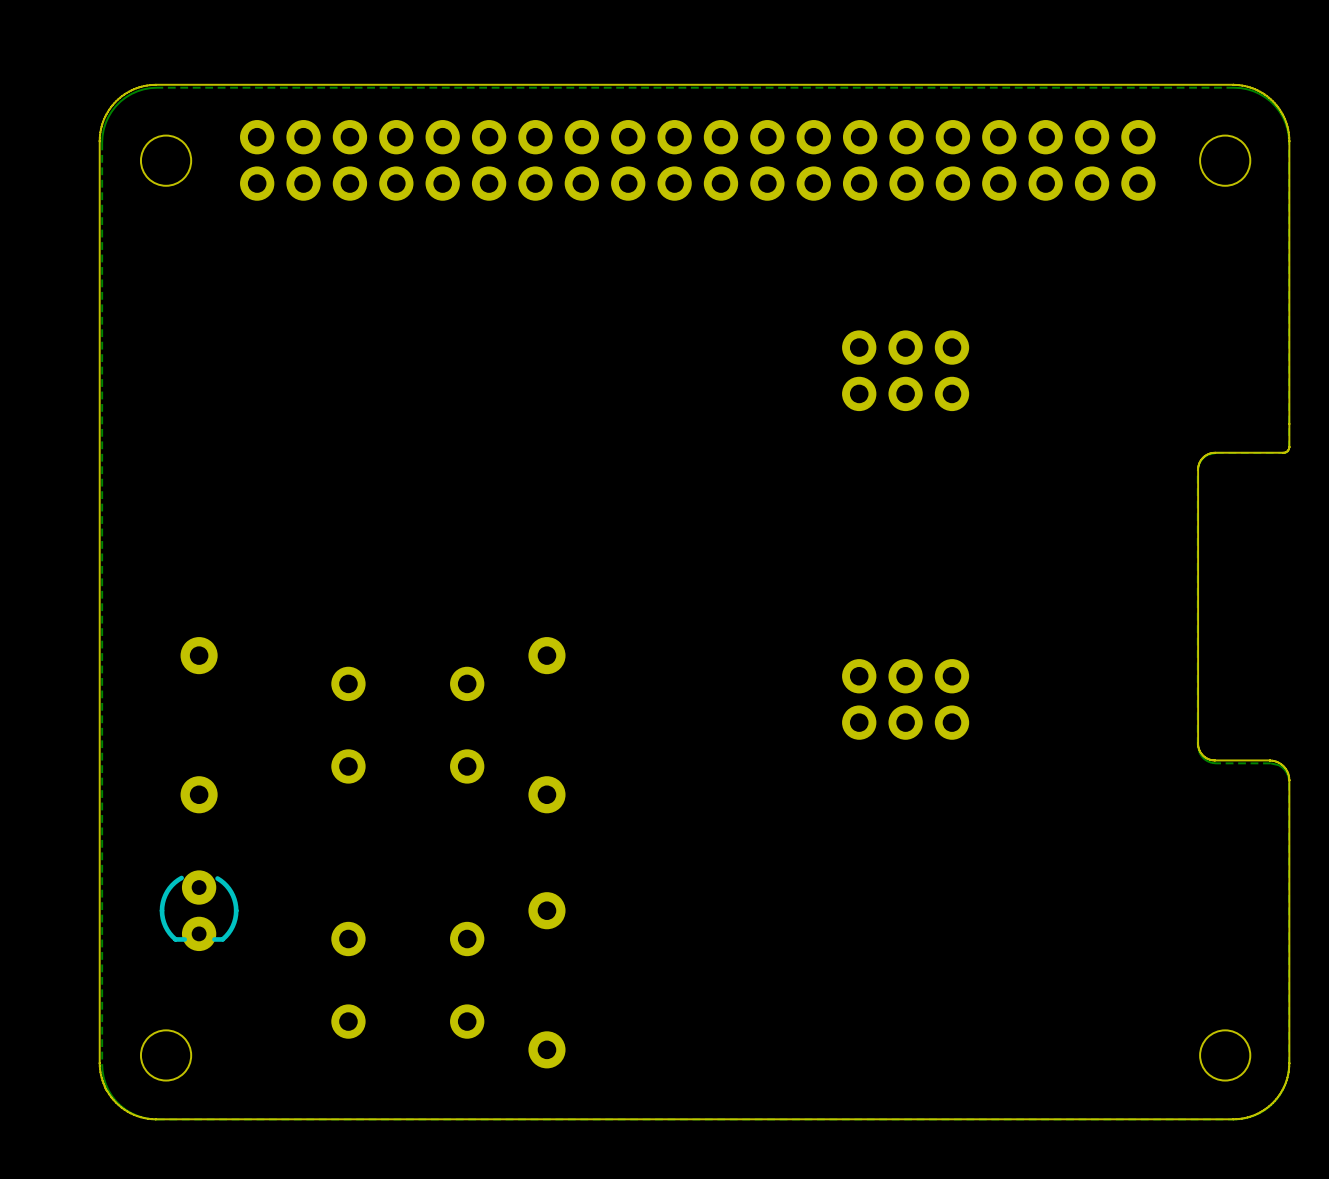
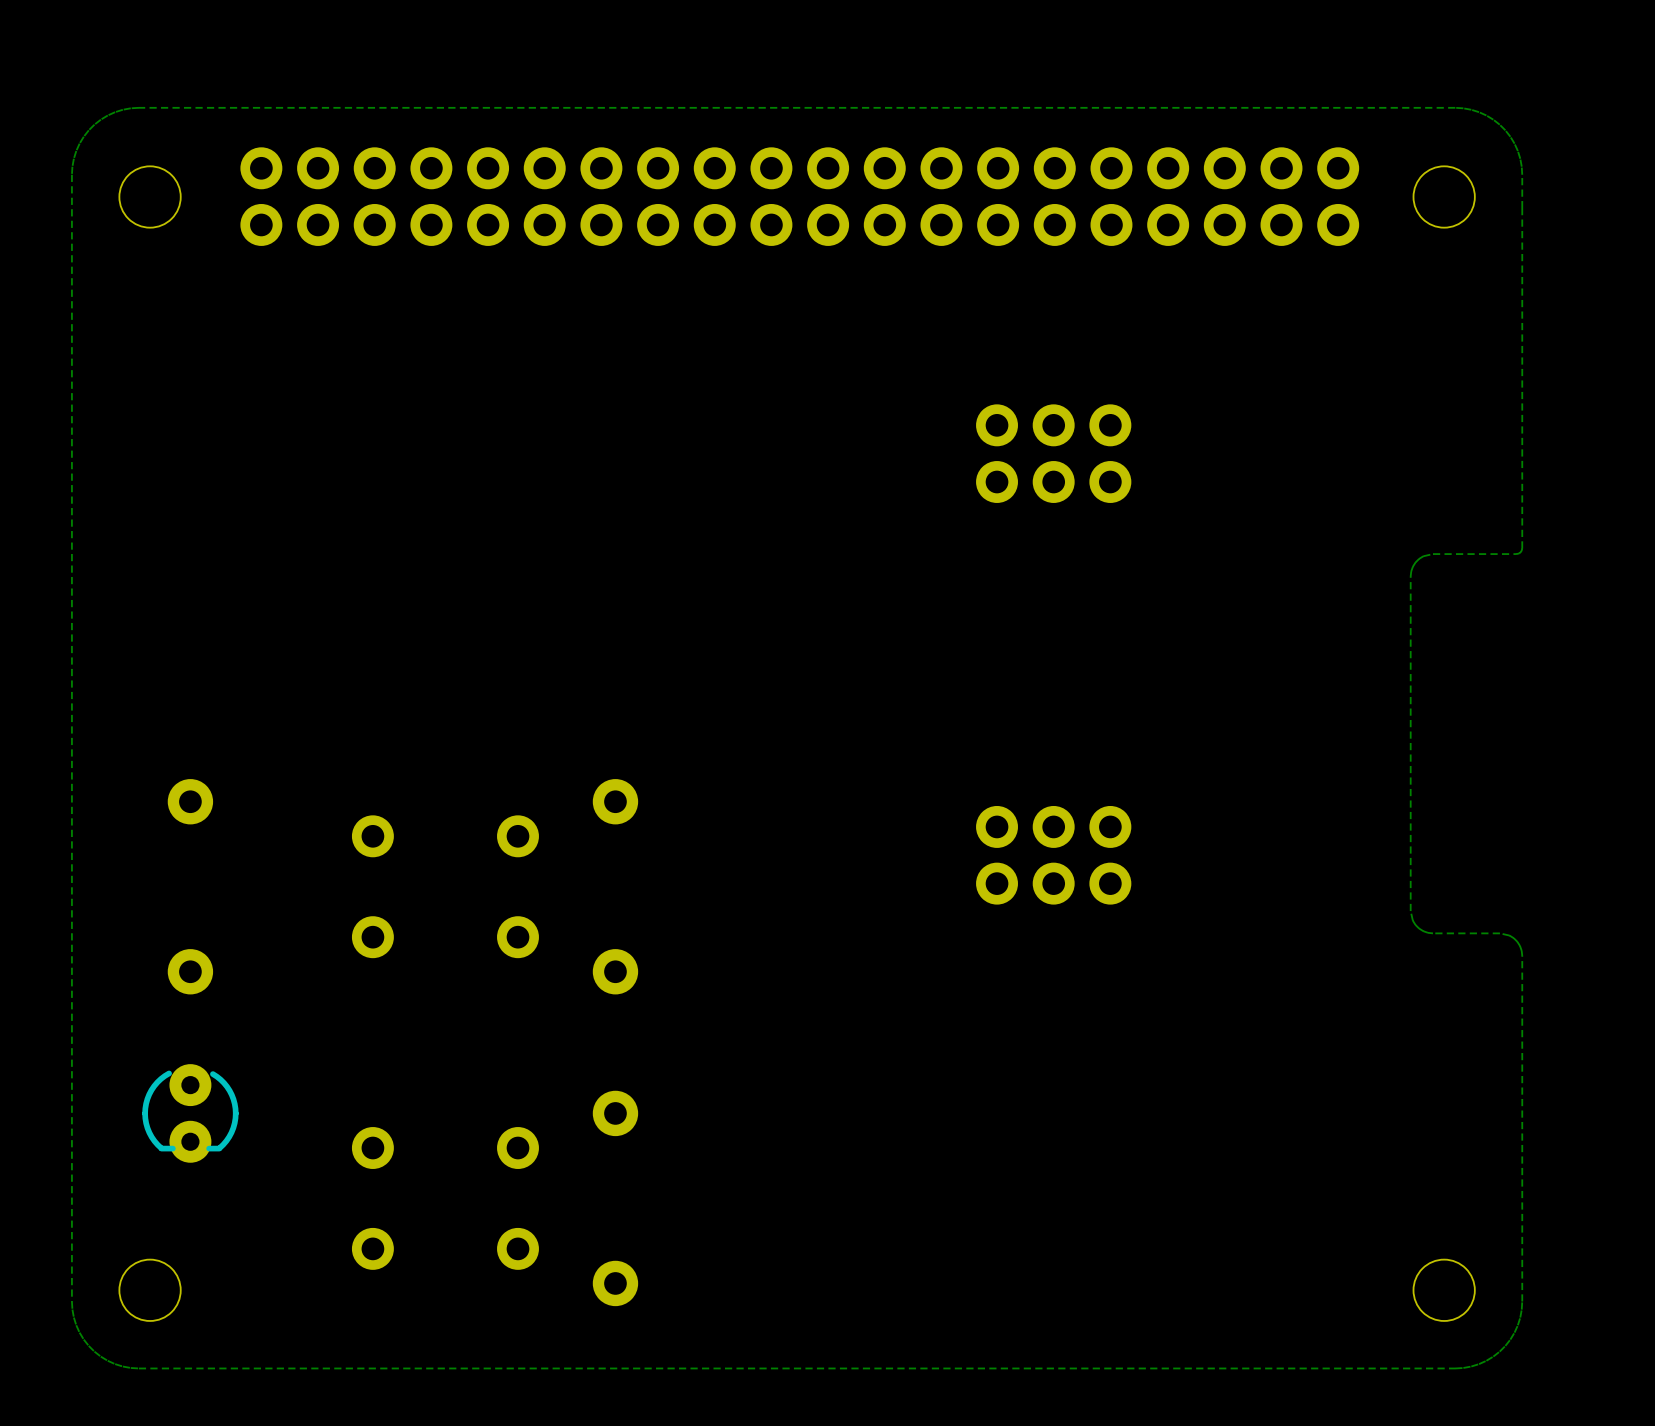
board edge: (155, 84) (133, 89) (116, 101) (104, 119) (99, 140) -> none
board edge: (1233, 84) (155, 84) -> none
board edge: (1233, 84) (1255, 89) (1273, 101) (1284, 119) (1289, 140) -> none
board edge: (99, 141) (99, 1066) (105, 1087) (116, 1102) (133, 1114) (155, 1119) -> none
board edge: (1289, 141) (1289, 446) -> none
board edge: (1289, 447) (1287, 451) (1283, 452) -> none
board edge: (1283, 452) (1211, 453) (1202, 458) (1198, 469) -> none
board edge: (1198, 469) (1198, 743) -> none
board edge: (1198, 743) (1203, 755) (1214, 760) -> none
board edge: (1215, 760) (1274, 761) (1284, 767) (1289, 779) -> none
board edge: (1289, 780) (1288, 1072) (1282, 1090) (1268, 1106) (1252, 1115) (1233, 1119) -> none
board edge: (1233, 1119) (155, 1119) -> none

